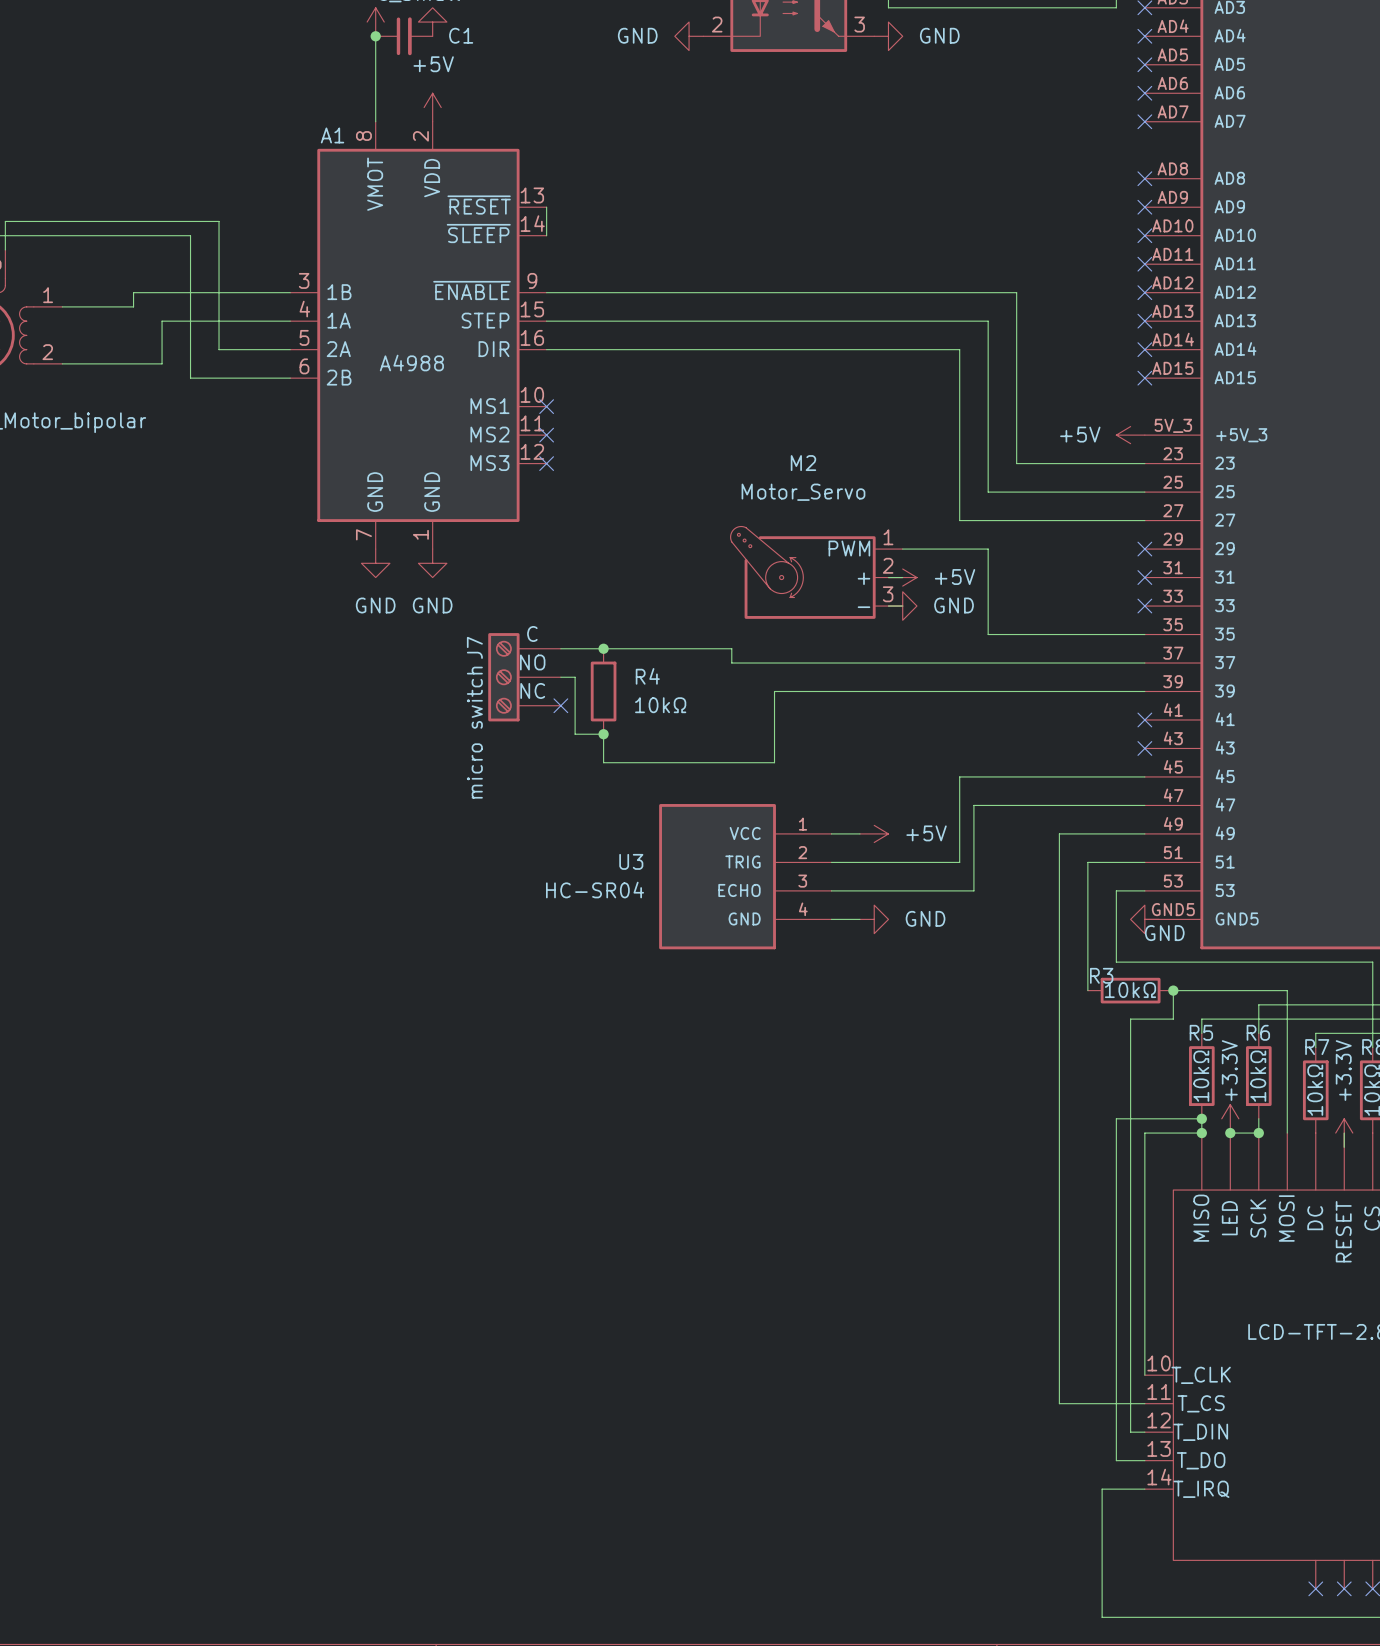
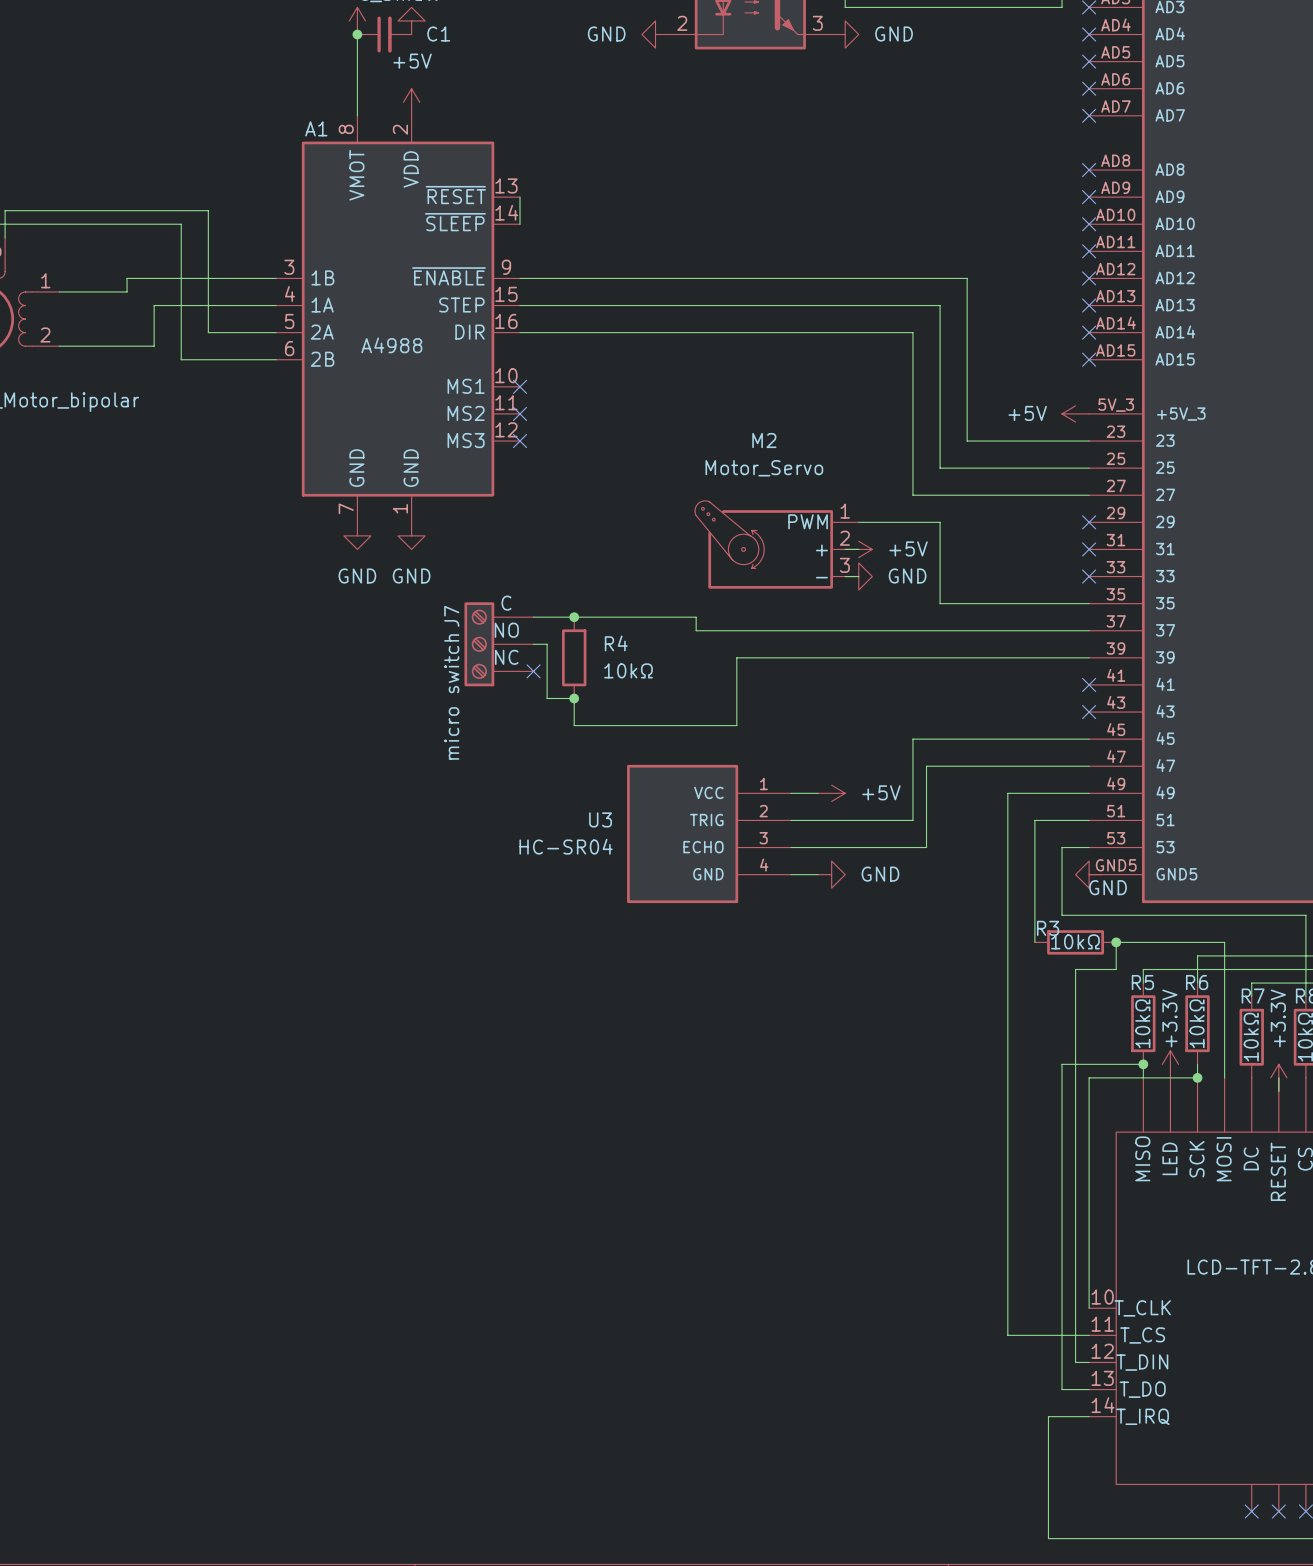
wire: none -> (1143, 1077) (1170, 1077)
junction: (1201, 1133) -> none
junction: (1230, 1133) -> none

